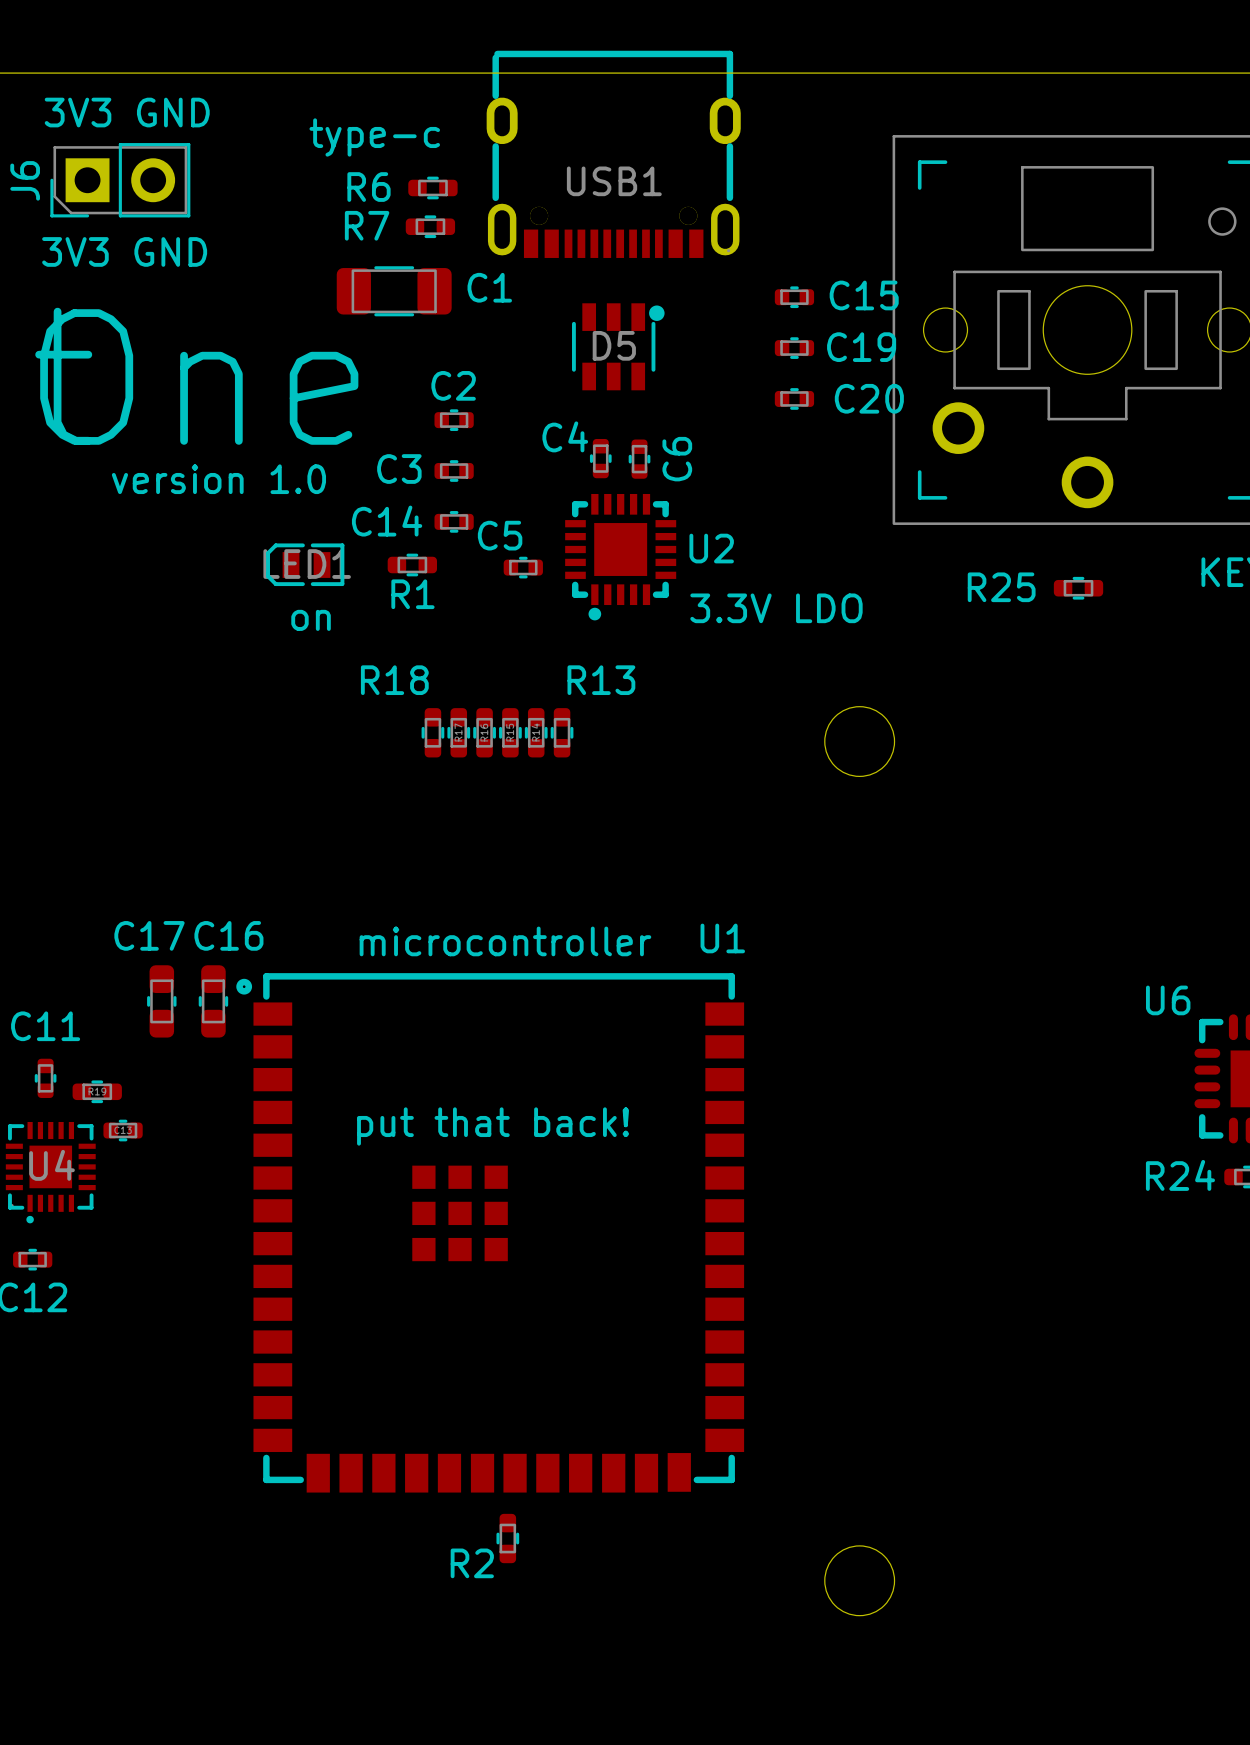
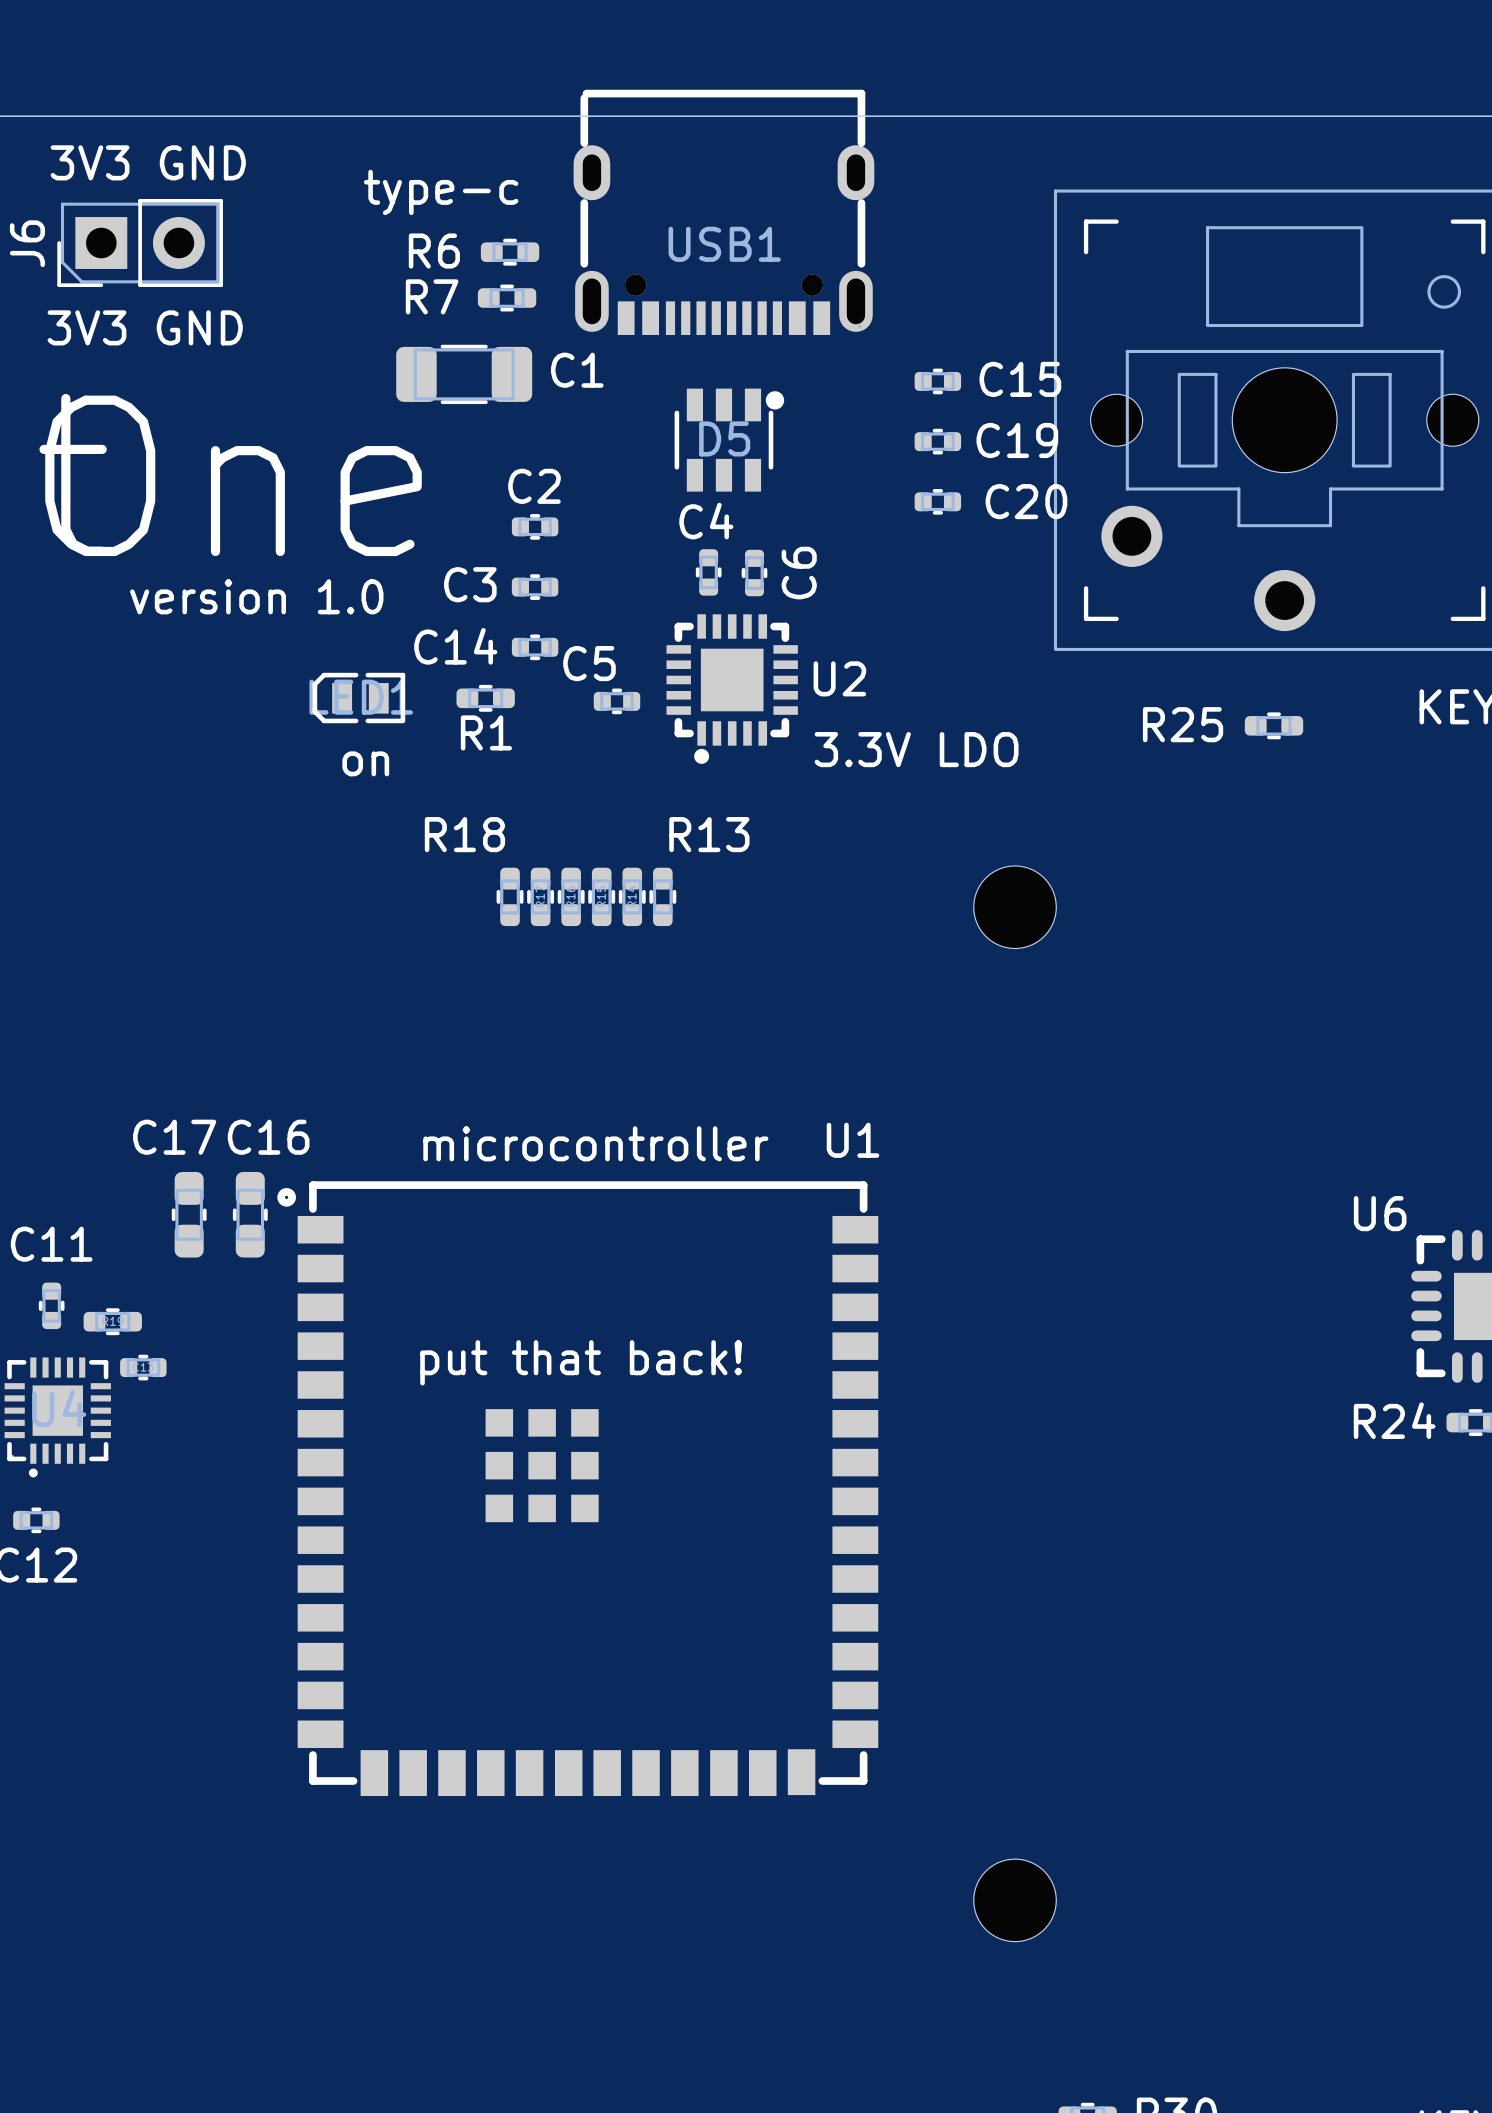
C4 name position: C4 (565, 436) -> C4 (706, 521)
R2: (507, 1538) -> none

